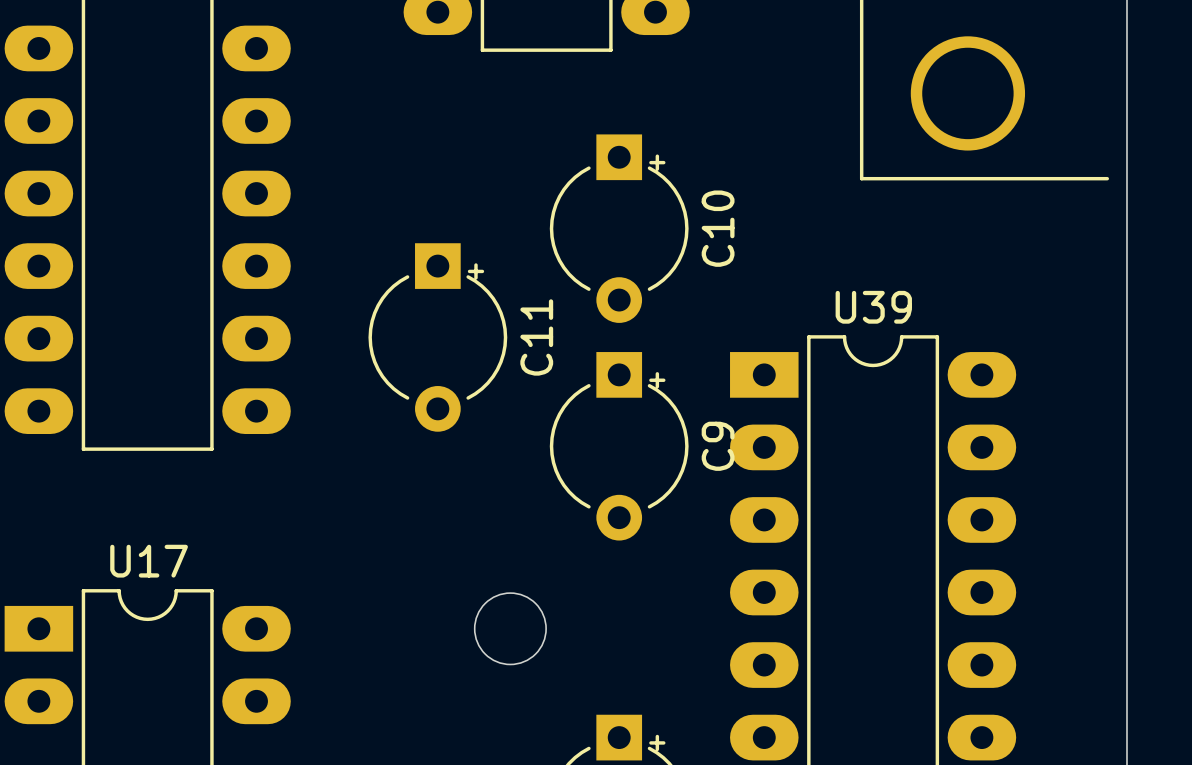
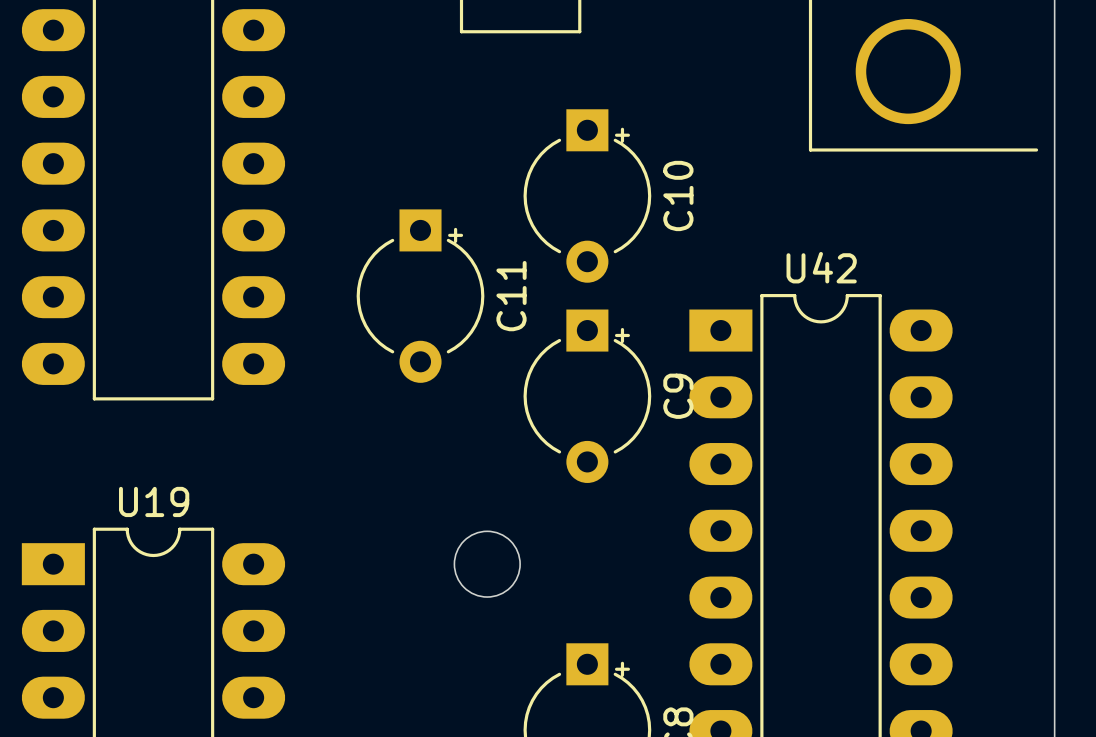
U39 name: U39 (873, 307) -> U42 (821, 267)
U17 name: U17 (149, 561) -> U19 (154, 501)

